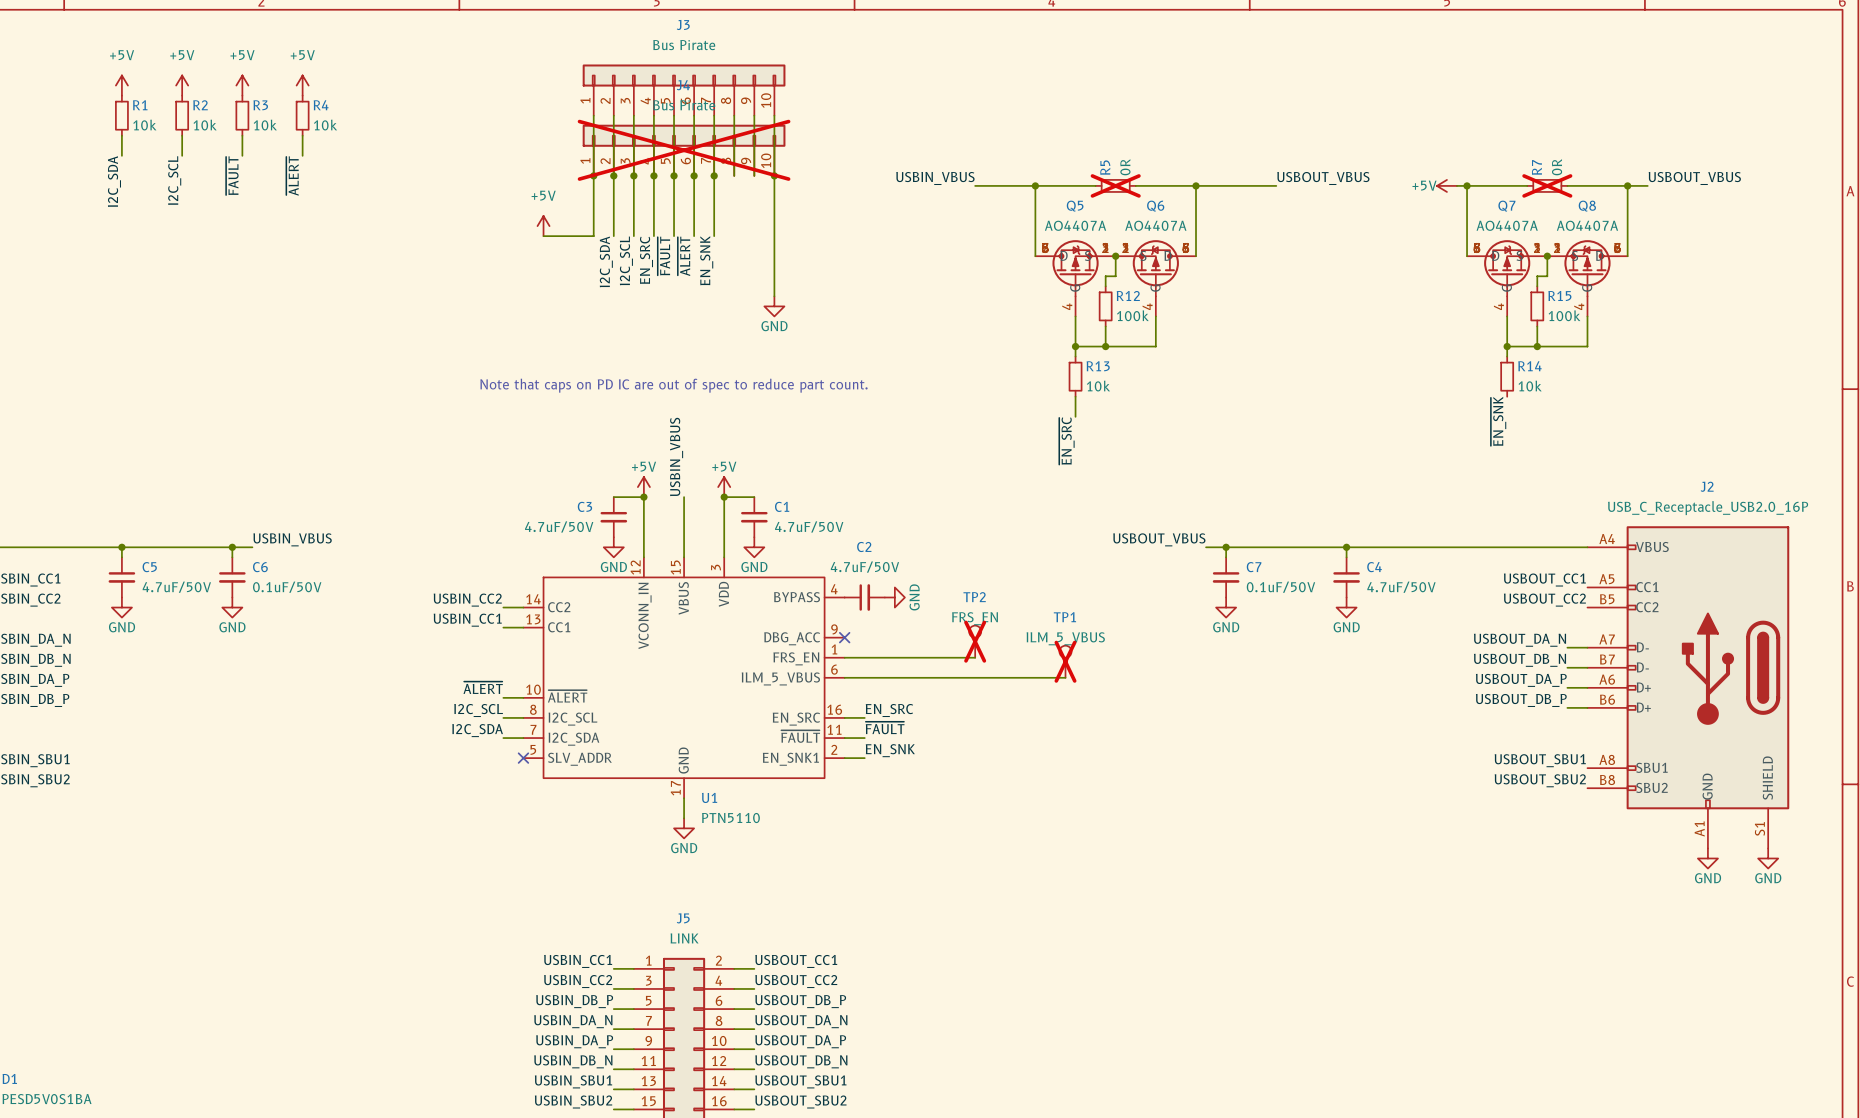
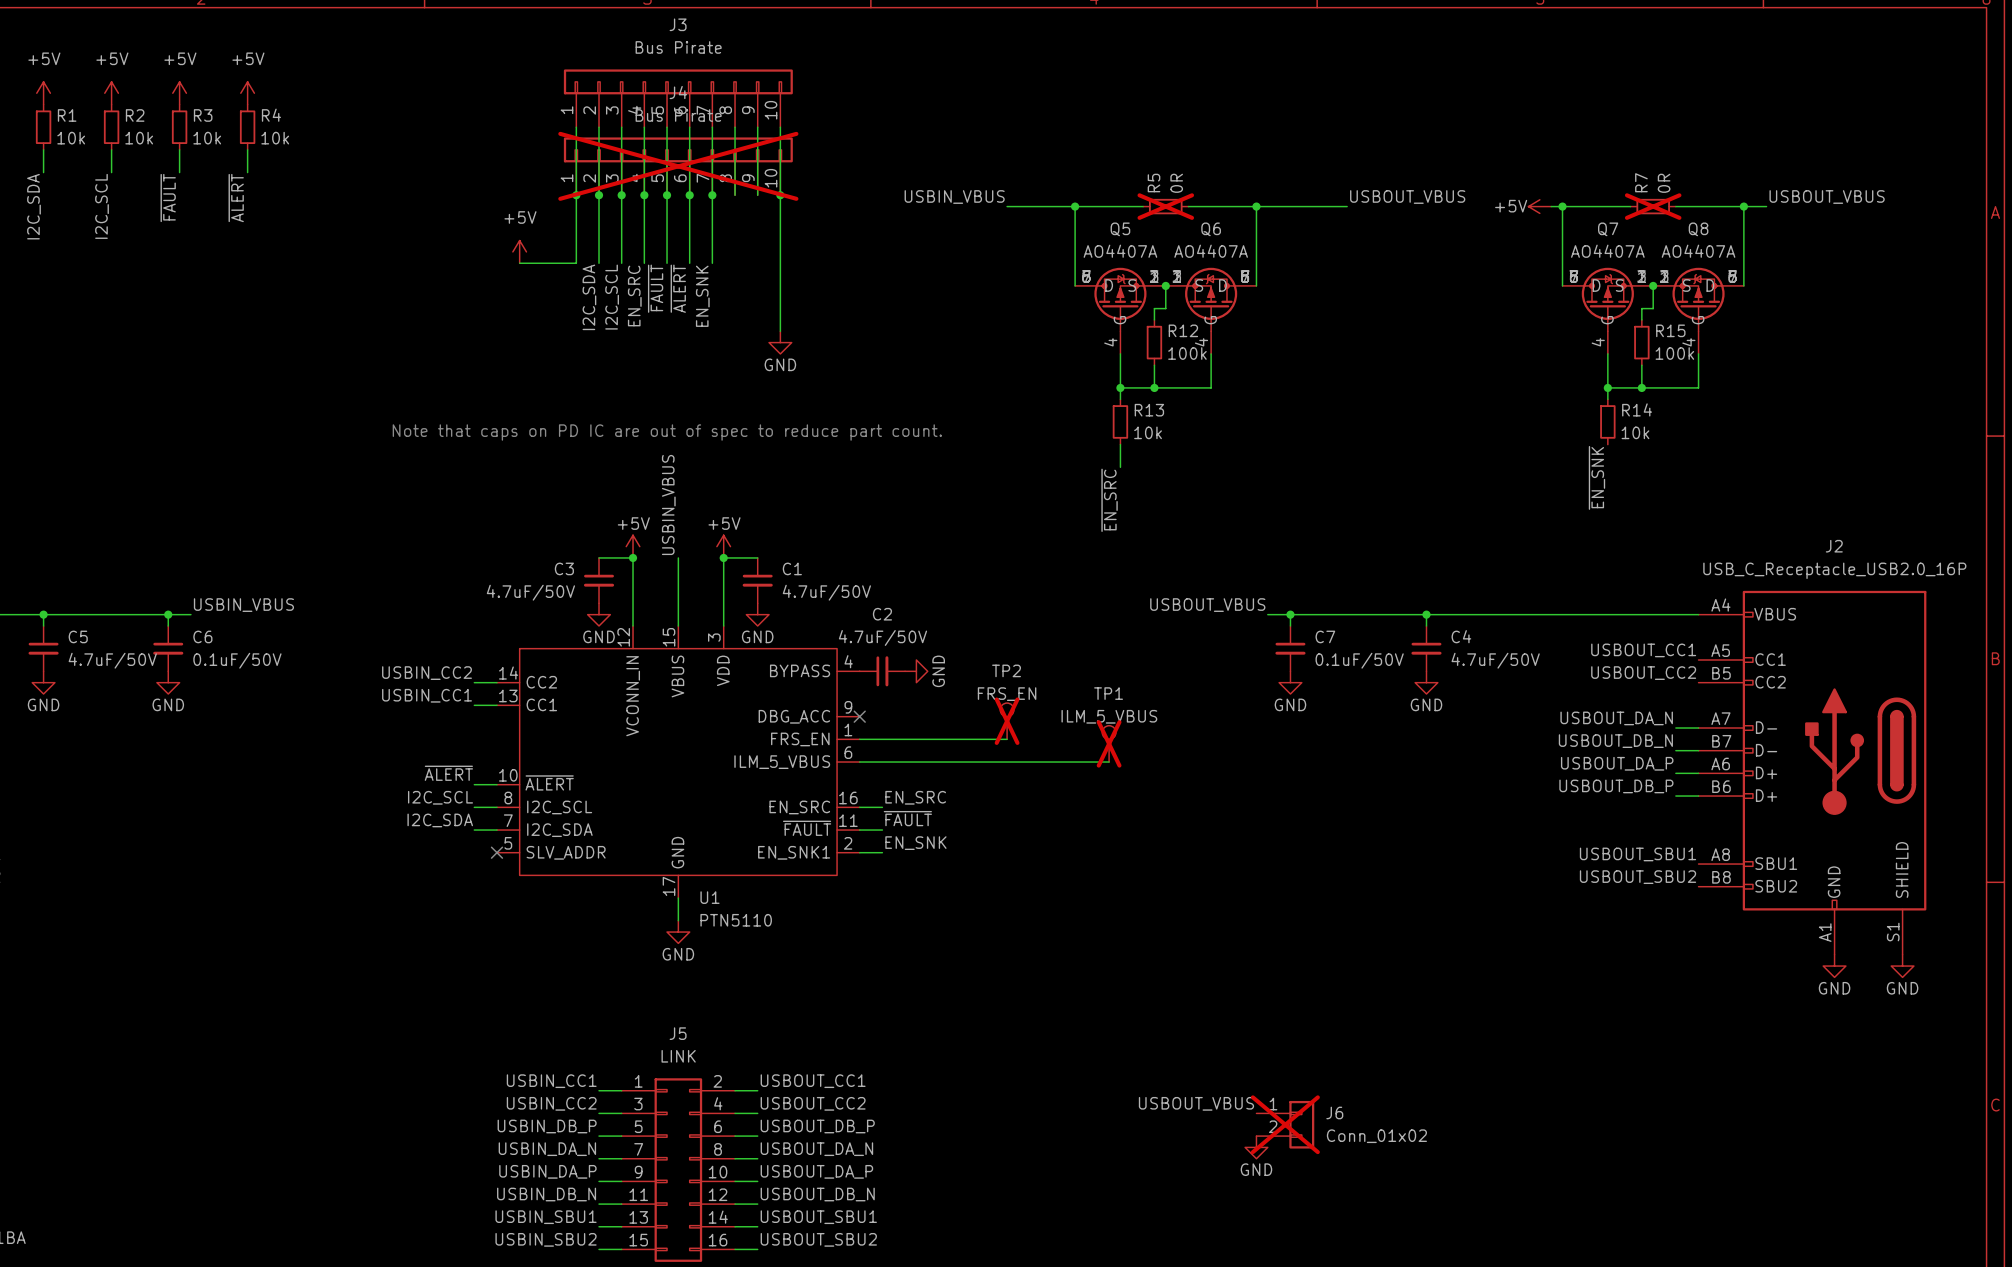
label: none -> USBOUT_VBUS (1196, 1103)
J6: none -> Conn_01x02 (1285, 1124)
power symbol: none -> GND (1256, 1147)

